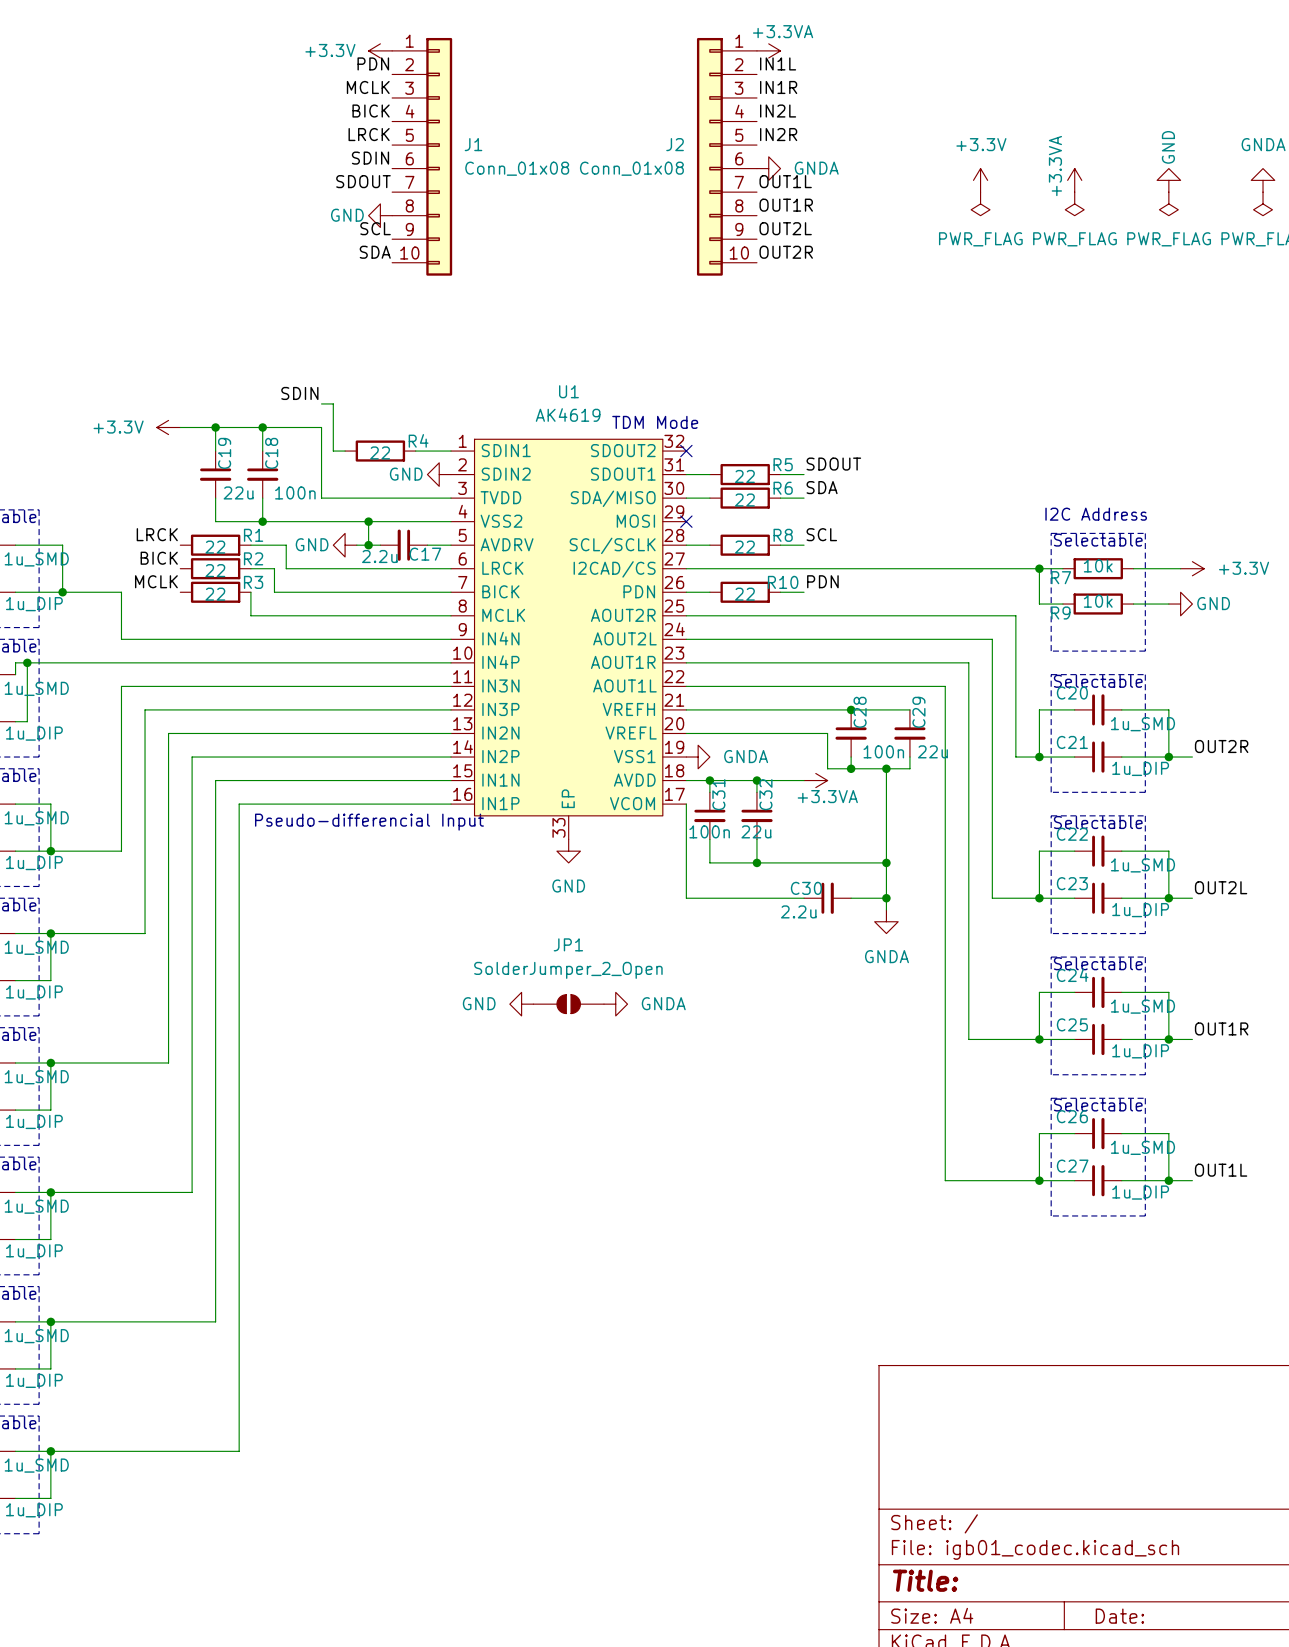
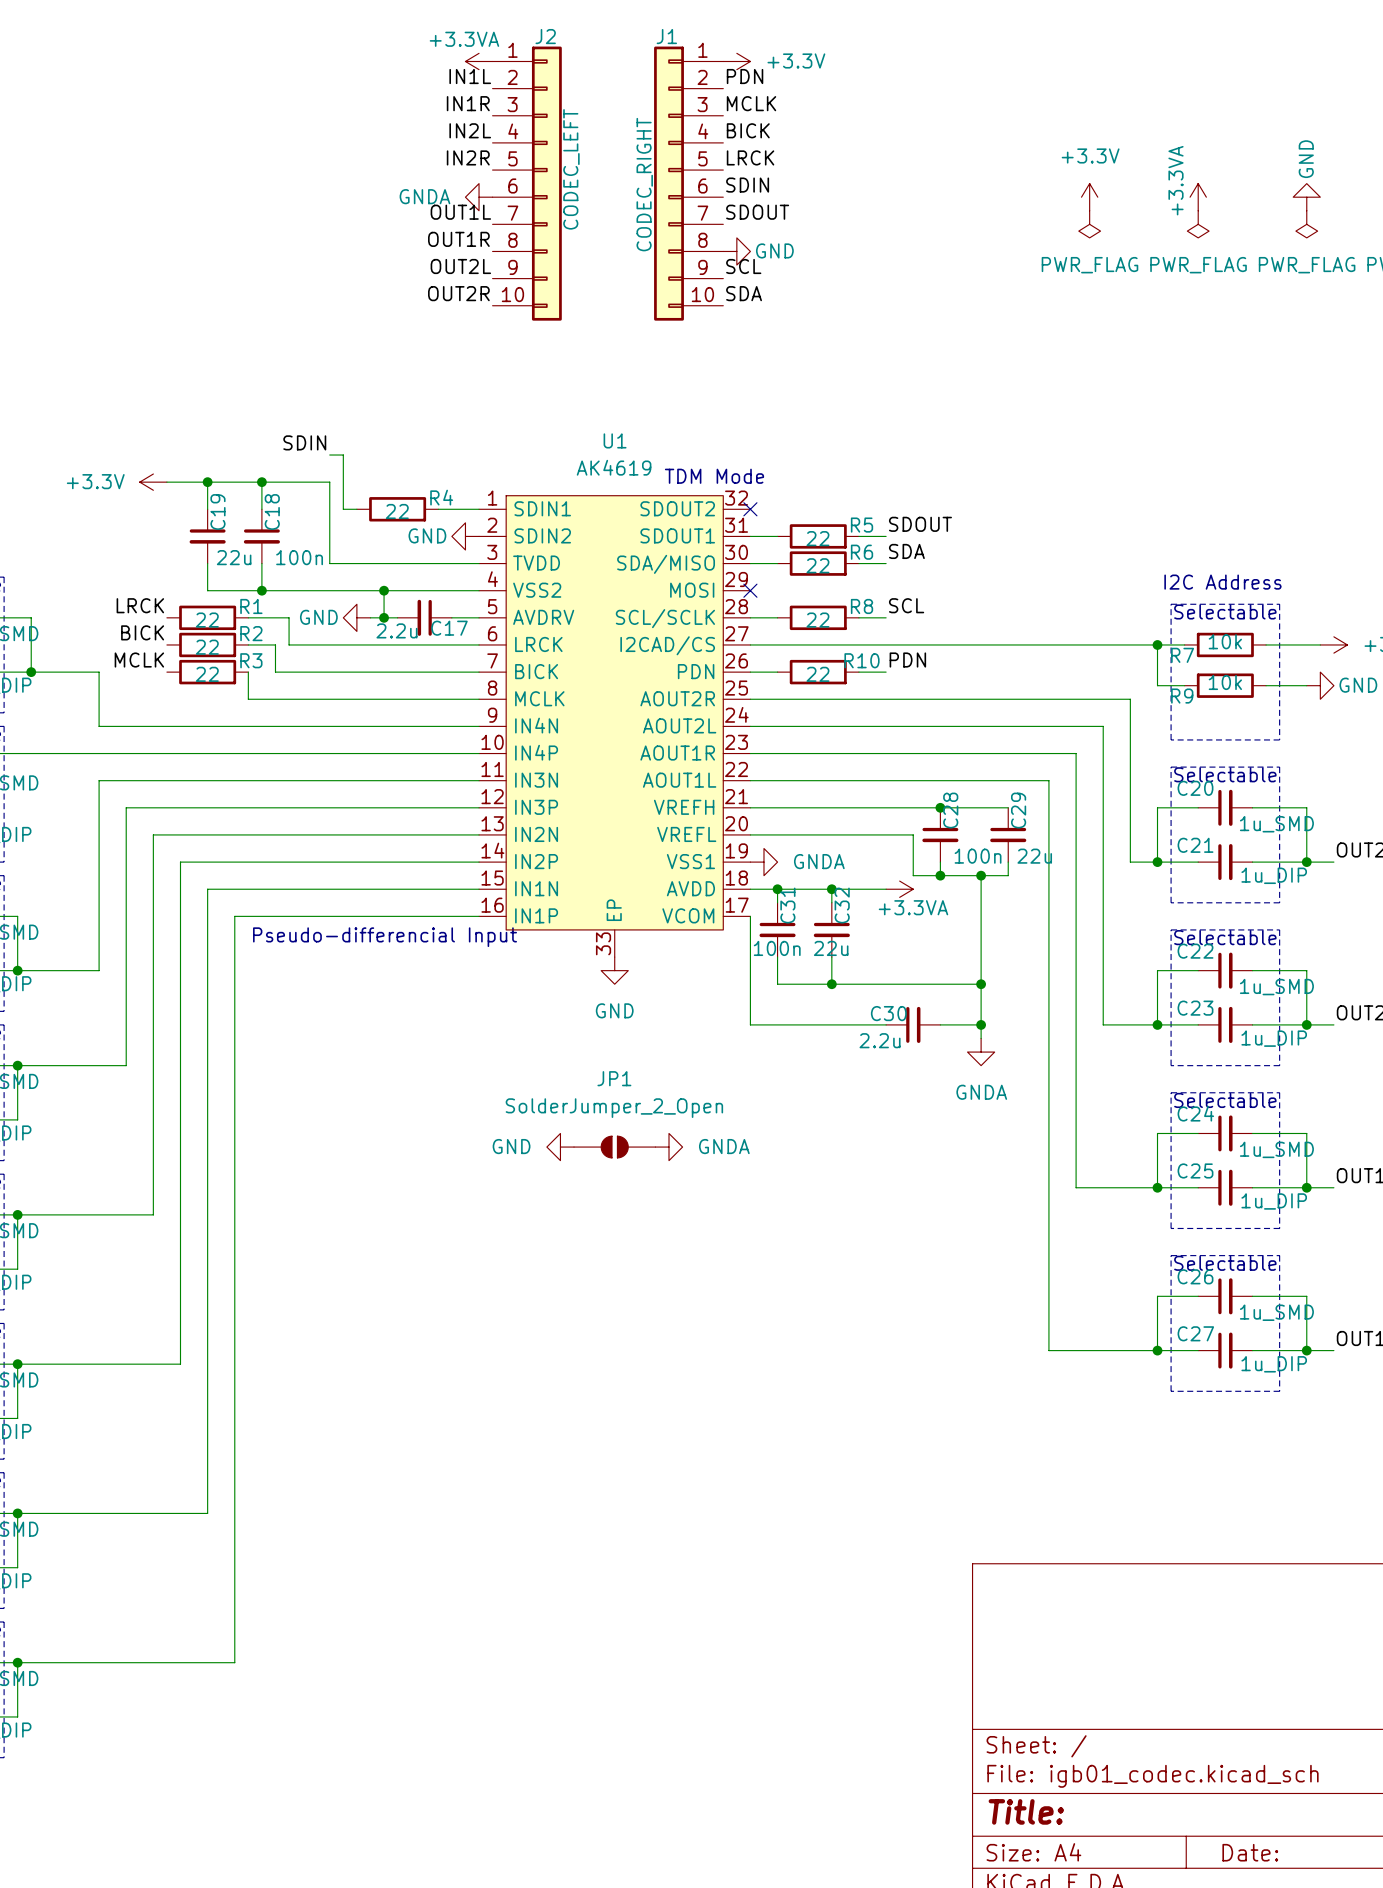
power symbol: +3.3V (380, 50) -> none
power symbol: +3.3VA (768, 50) -> none
power symbol: none -> +3.3VA (479, 61)
power symbol: none -> +3.3V (736, 61)
label: PDN (373, 63) -> none
label: IN1L (778, 63) -> none
label: none -> IN1L (470, 76)
label: none -> PDN (745, 76)
label: MCLK (368, 87) -> none
label: IN1R (778, 87) -> none
label: none -> IN1R (468, 103)
label: none -> MCLK (751, 103)
label: BICK (371, 111) -> none
label: IN2L (778, 111) -> none
label: none -> IN2L (470, 130)
label: none -> BICK (748, 130)
label: LRCK (369, 134) -> none
label: IN2R (778, 134) -> none
J1 name position: J1 (473, 144) -> J1 (666, 36)
J2 name position: J2 (675, 144) -> J2 (545, 36)
label: none -> IN2R (468, 157)
label: none -> LRCK (750, 157)
J1 position: (422, 156) -> (688, 183)
J1 flip: as is (439, 156) -> left-right (669, 183)
J2 flip: as is (709, 156) -> left-right (546, 183)
J2 position: (726, 156) -> (527, 183)
label: SDIN (370, 158) -> none
J1 value: Conn_01x08 (517, 168) -> CODEC_RIGHT (644, 184)
J2 value: Conn_01x08 (631, 168) -> CODEC_LEFT (571, 169)
power symbol: GNDA (768, 168) -> none
label: none -> SDIN (747, 185)
power symbol: none -> GNDA (479, 197)
label: SDOUT (363, 181) -> none
label: OUT1L (785, 181) -> none
label: none -> OUT1L (460, 212)
label: none -> SDOUT (757, 212)
label: OUT1R (786, 205) -> none
power symbol: GND (380, 215) -> none
label: none -> OUT1R (458, 239)
power symbol: none -> GND (736, 251)
label: SCL (375, 228) -> none
label: OUT2L (785, 228) -> none
label: none -> OUT2L (460, 266)
label: none -> SCL (743, 266)
label: SDA (375, 252) -> none
label: OUT2R (786, 252) -> none
label: none -> OUT2R (458, 293)
label: none -> SDA (744, 293)

